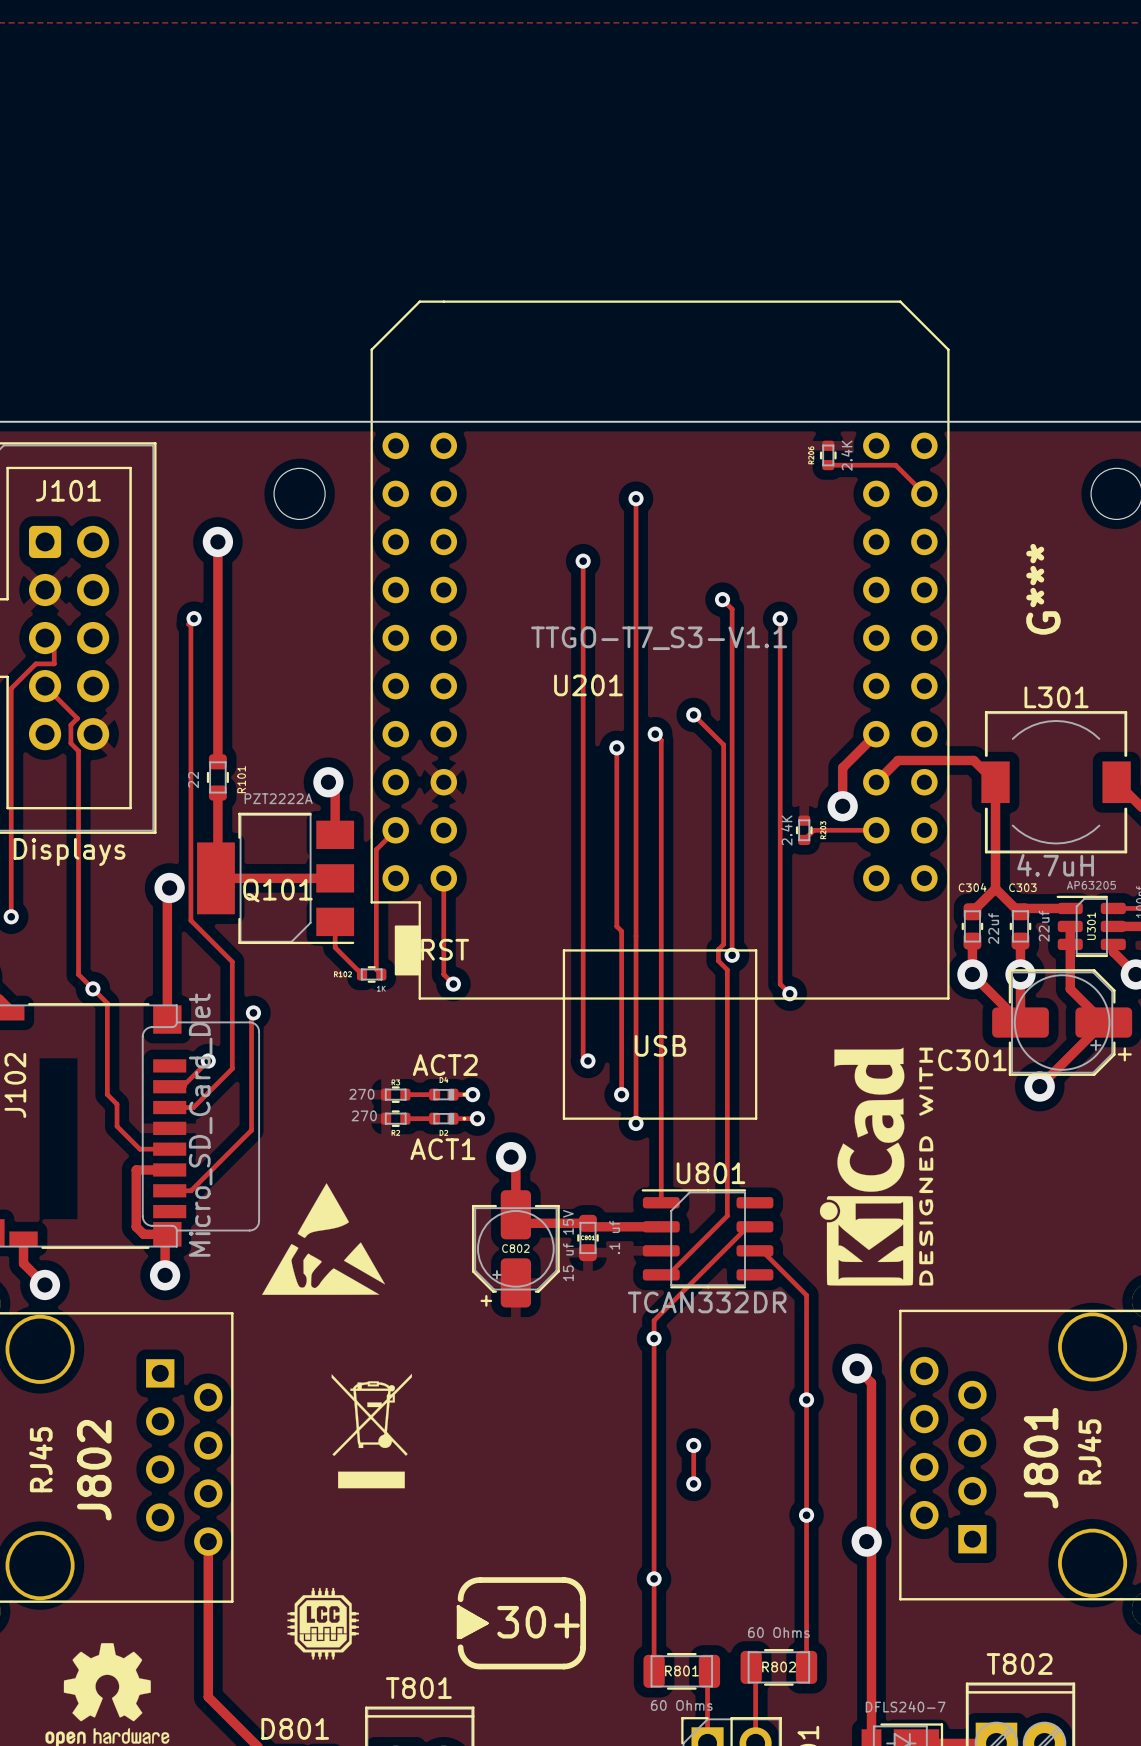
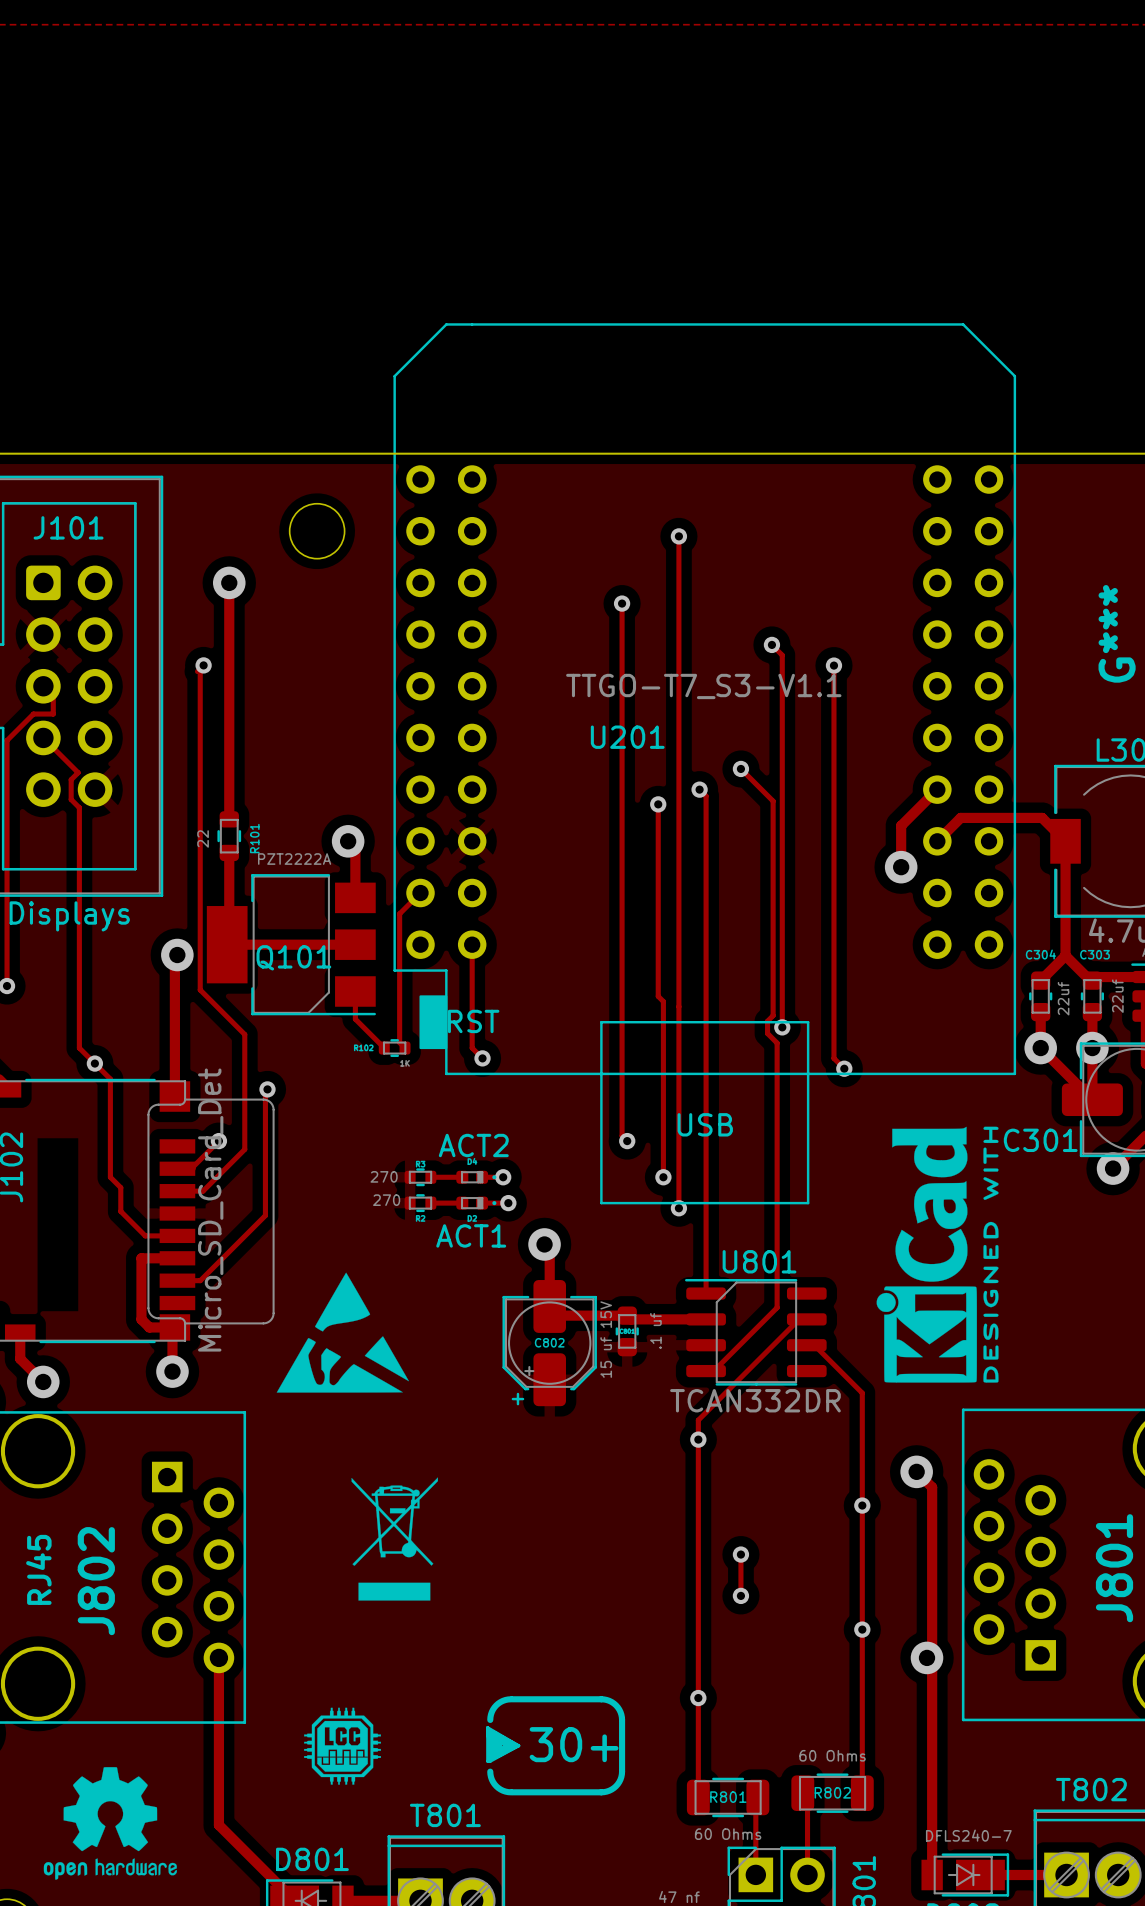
part: 2.4K (828, 455) -> none
track: (828, 465) (895, 465) (924, 493) -> none
part: 2.4K (804, 830) -> none
track: (876, 830) (813, 830) (804, 839) -> none

